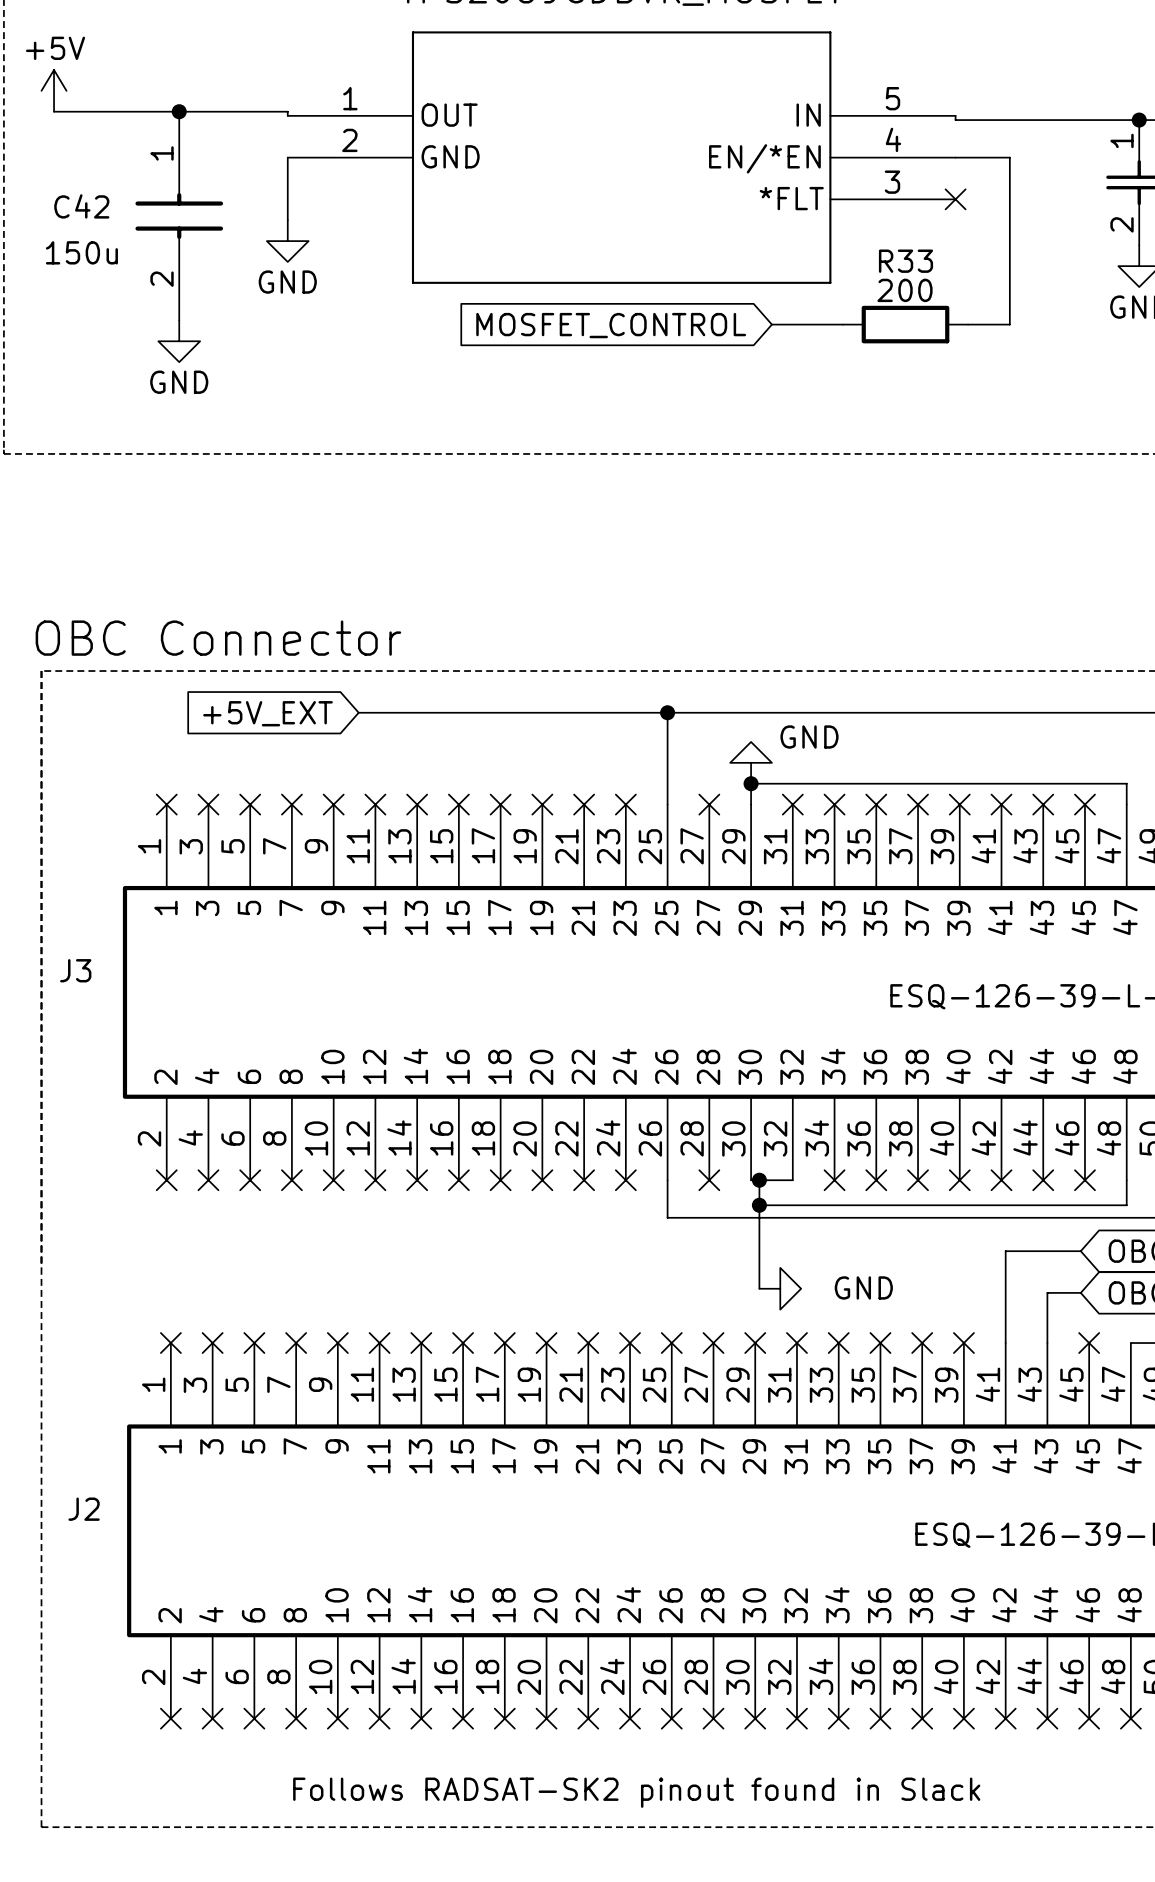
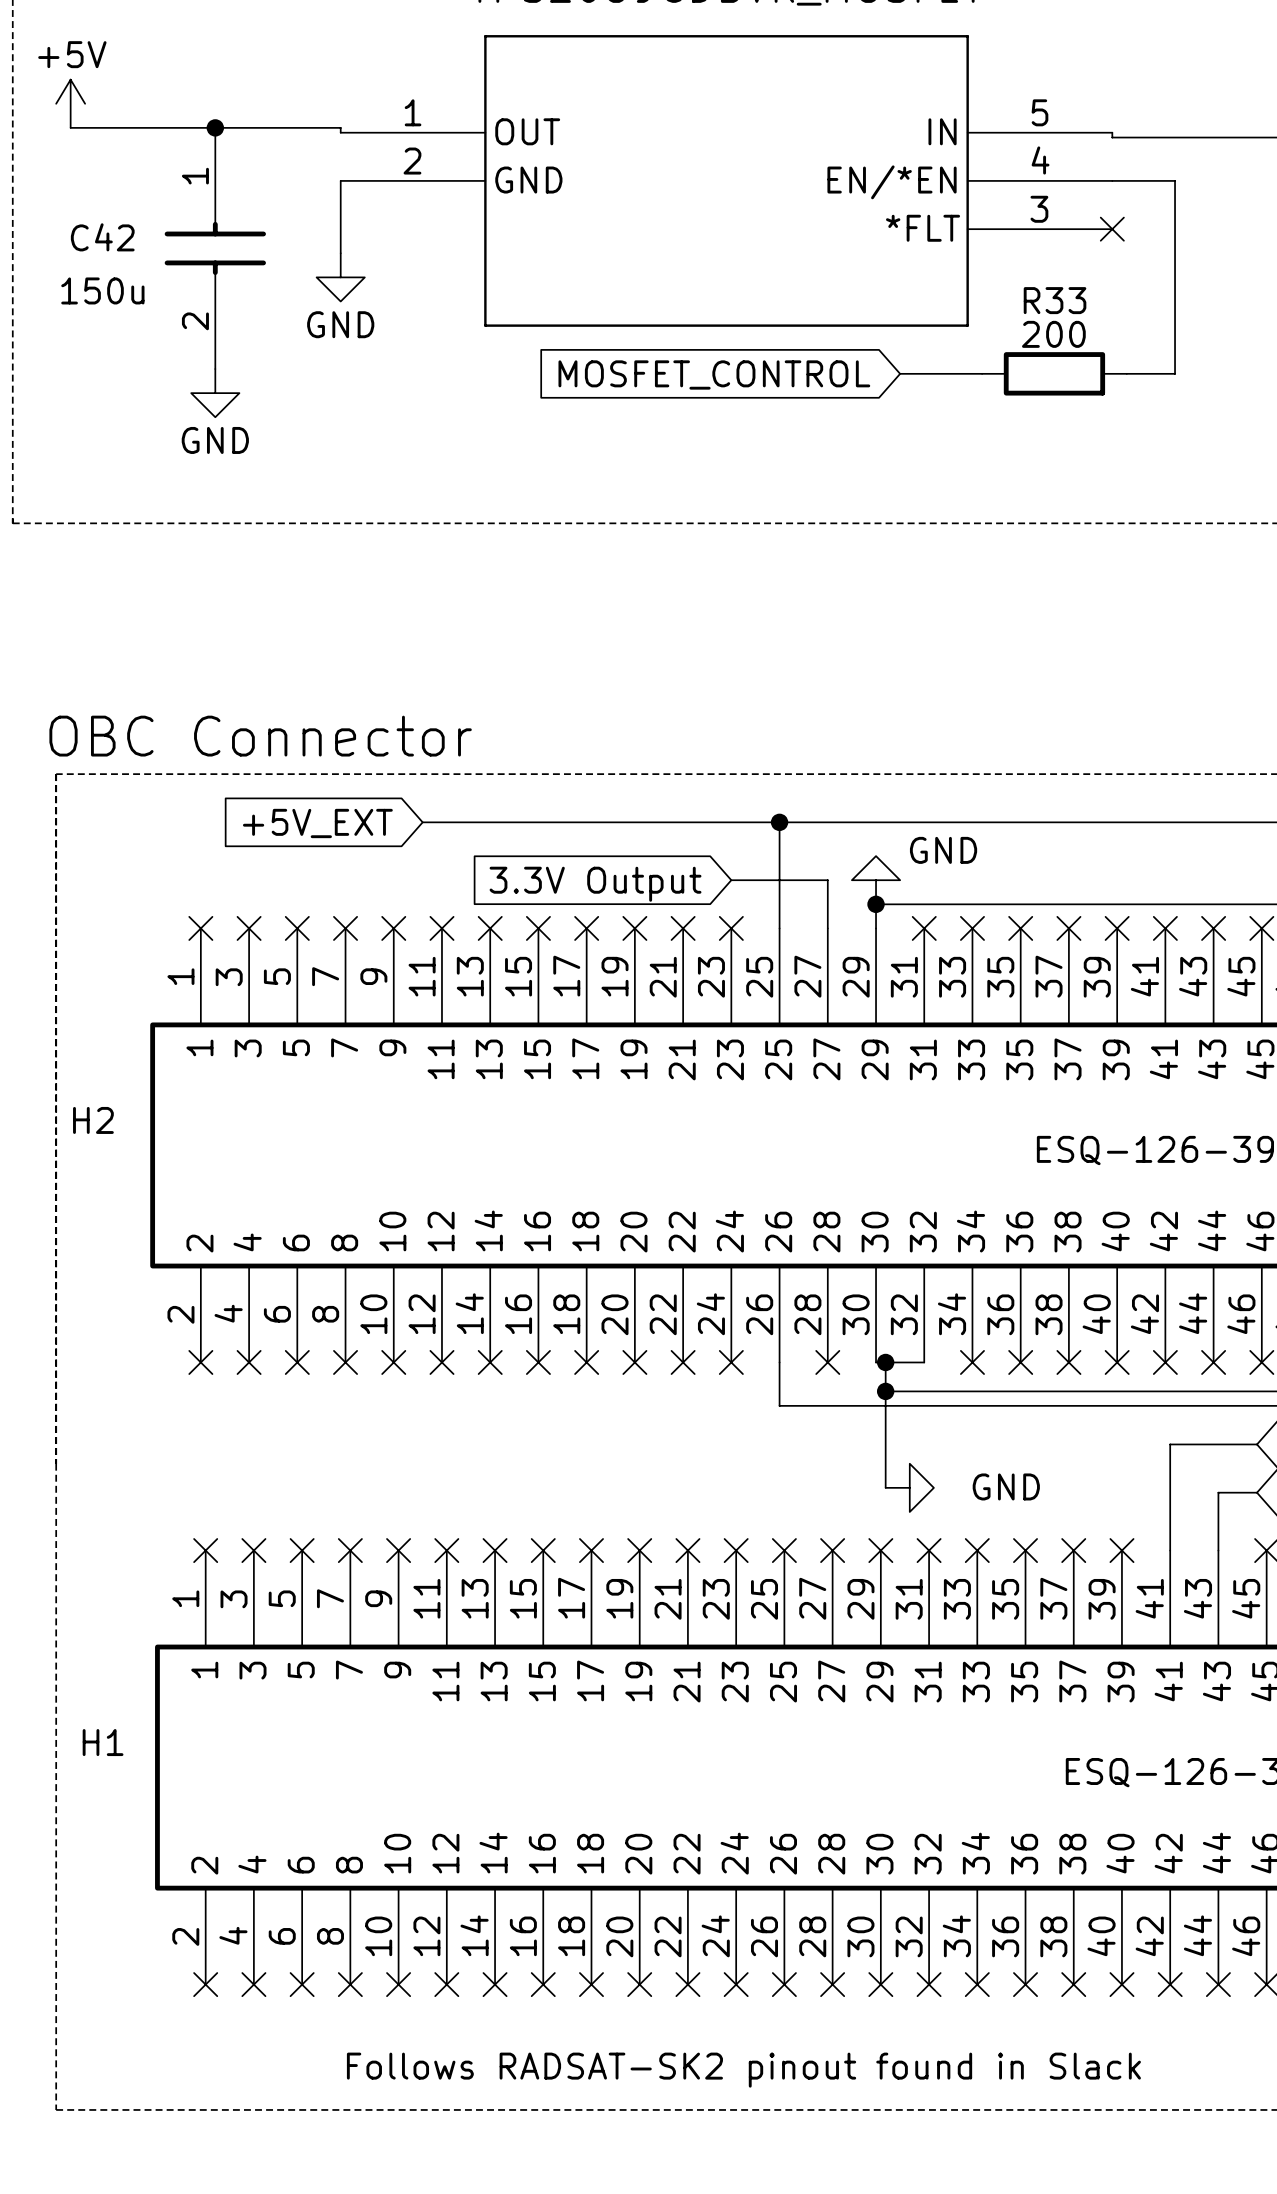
wire: none -> (731, 880) (827, 880) (827, 928)
global label: none -> 3.3V Output (595, 884)
no-connect mark: (709, 804) -> none
J3 name: J3 (75, 970) -> H2 (93, 1120)
J2 name: J2 (84, 1509) -> H1 (103, 1742)

